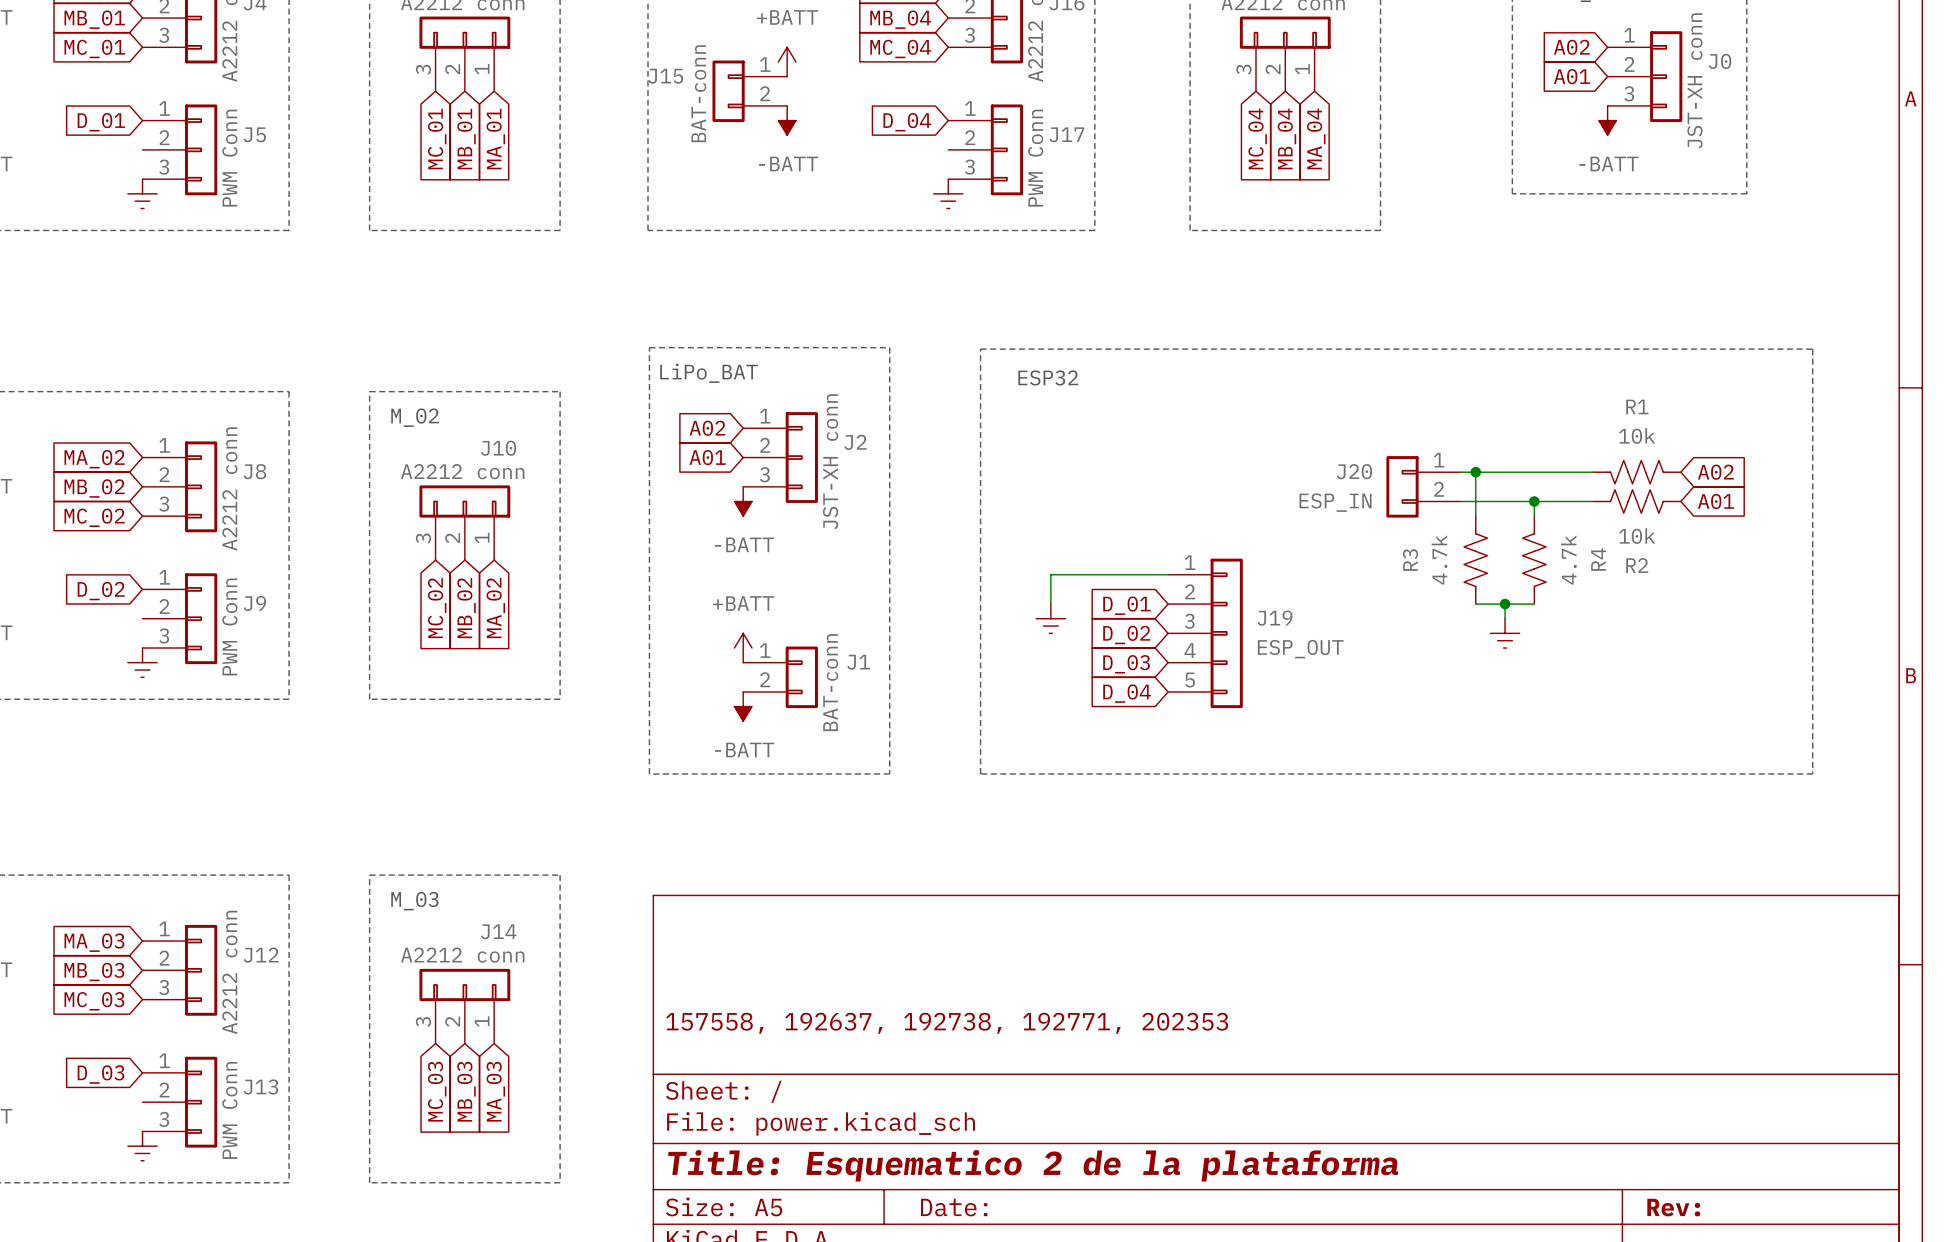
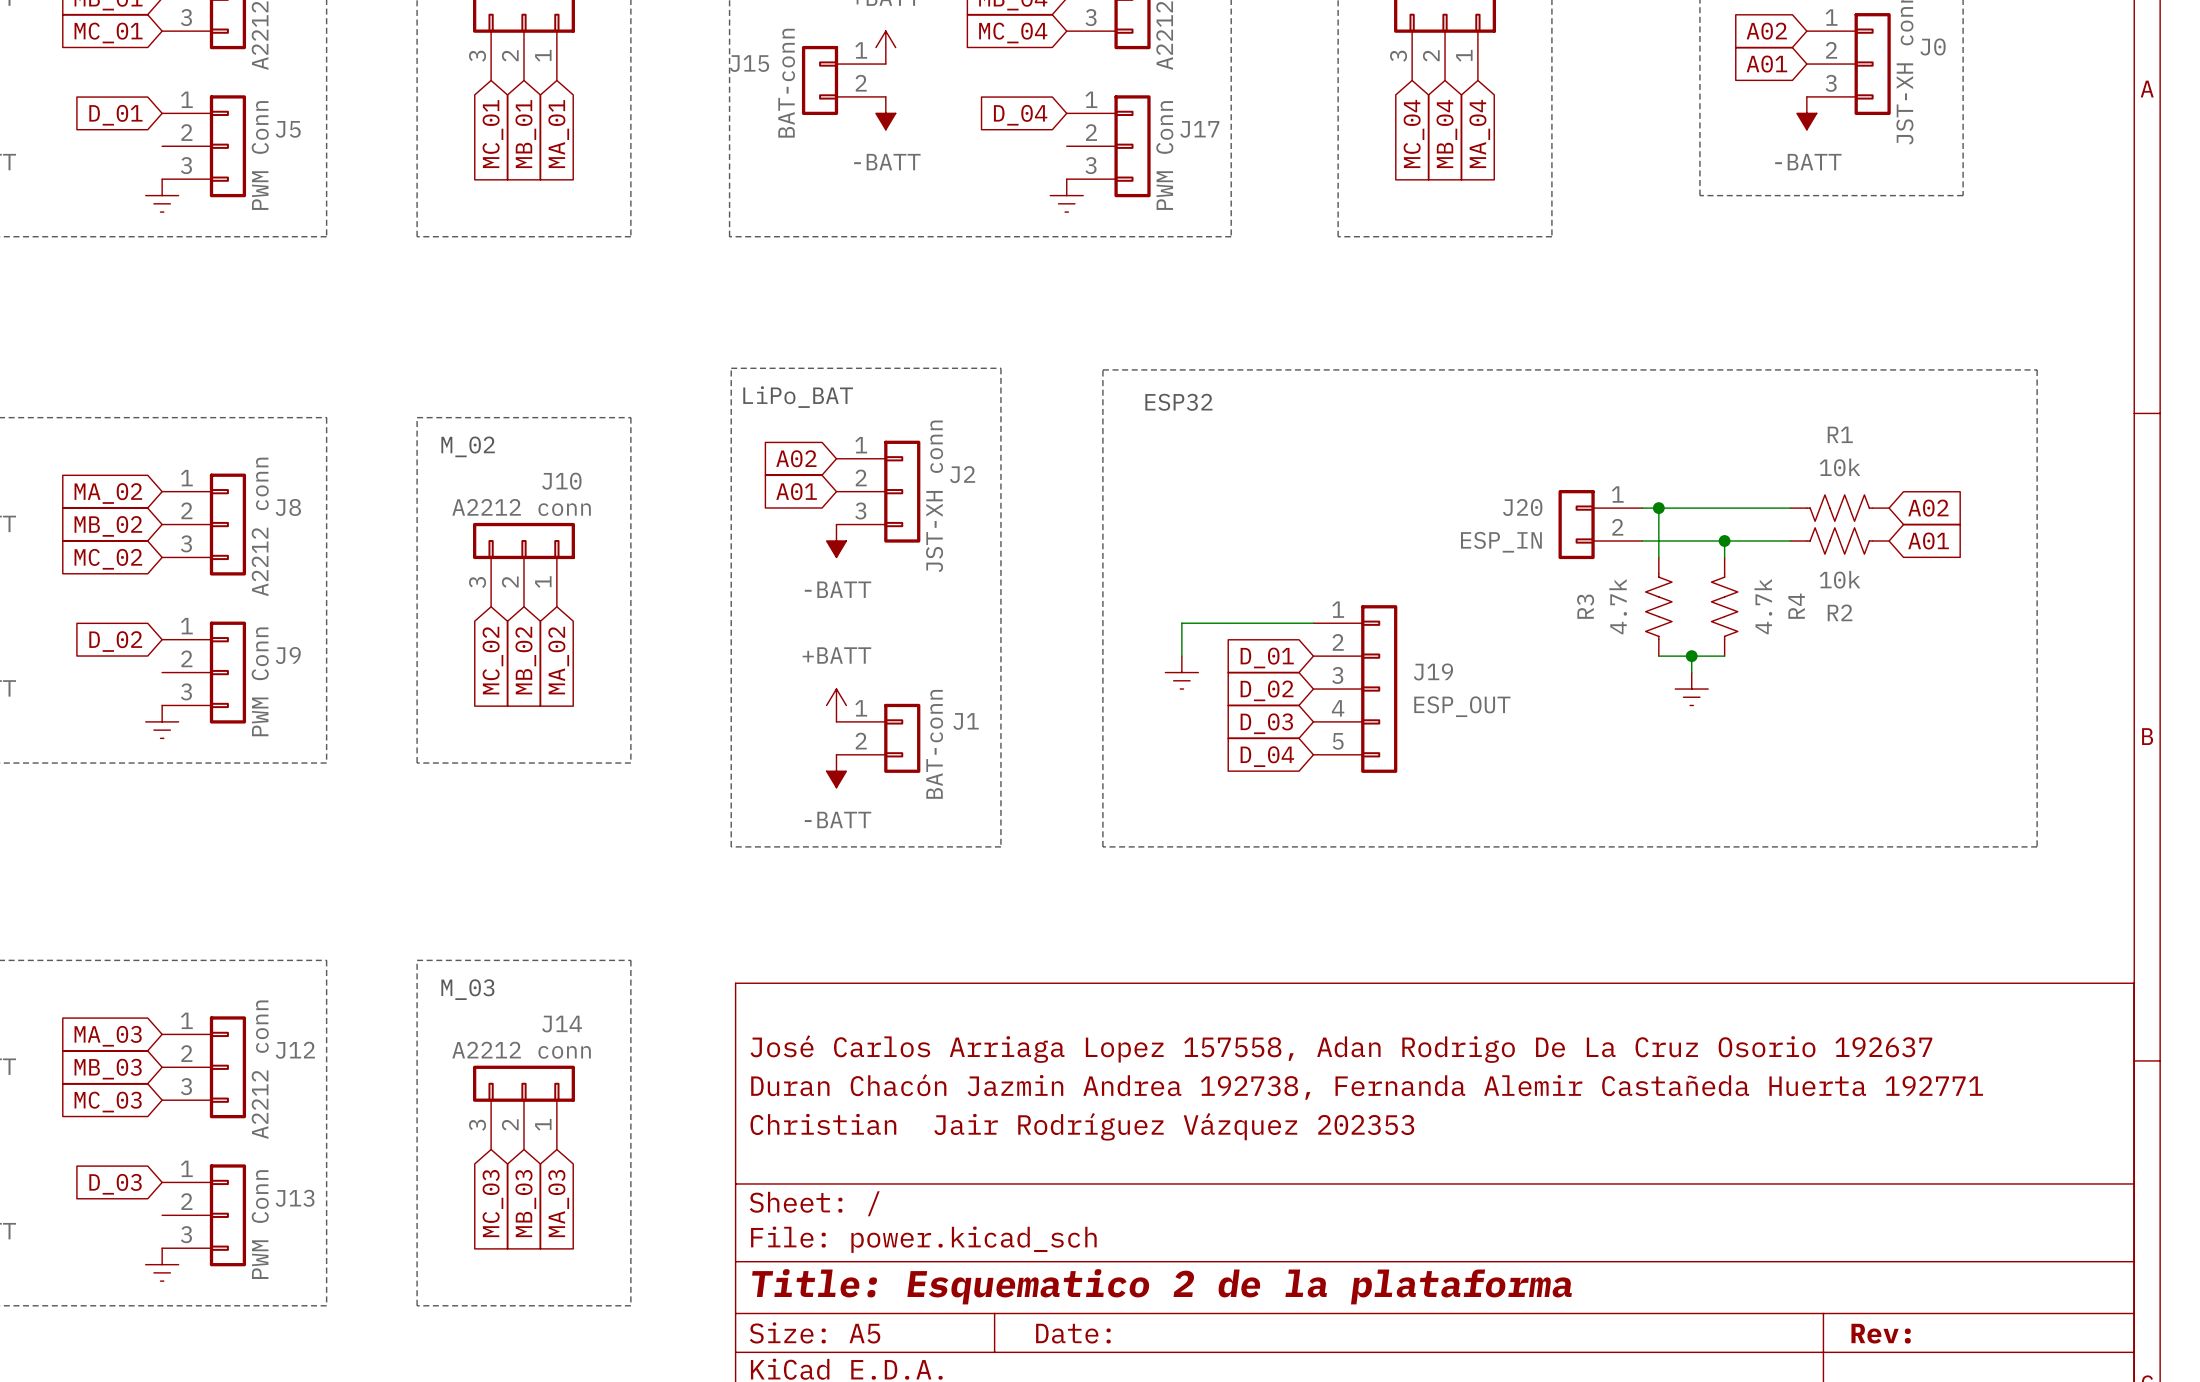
title block: none -> José Carlos Arriaga Lopez 157558, Adan Rodrigo De La Cruz Osorio 192637 (1341, 1049)
title block: none -> Duran Chacón Jazmin Andrea 192738, Fernanda Alemir Castañeda Huerta 192771 (1367, 1086)
title block: 157558, 192637, 192738, 192771, 202353 (947, 1023) -> Christian Jair Rodríguez Vázquez 202353 (1082, 1126)

